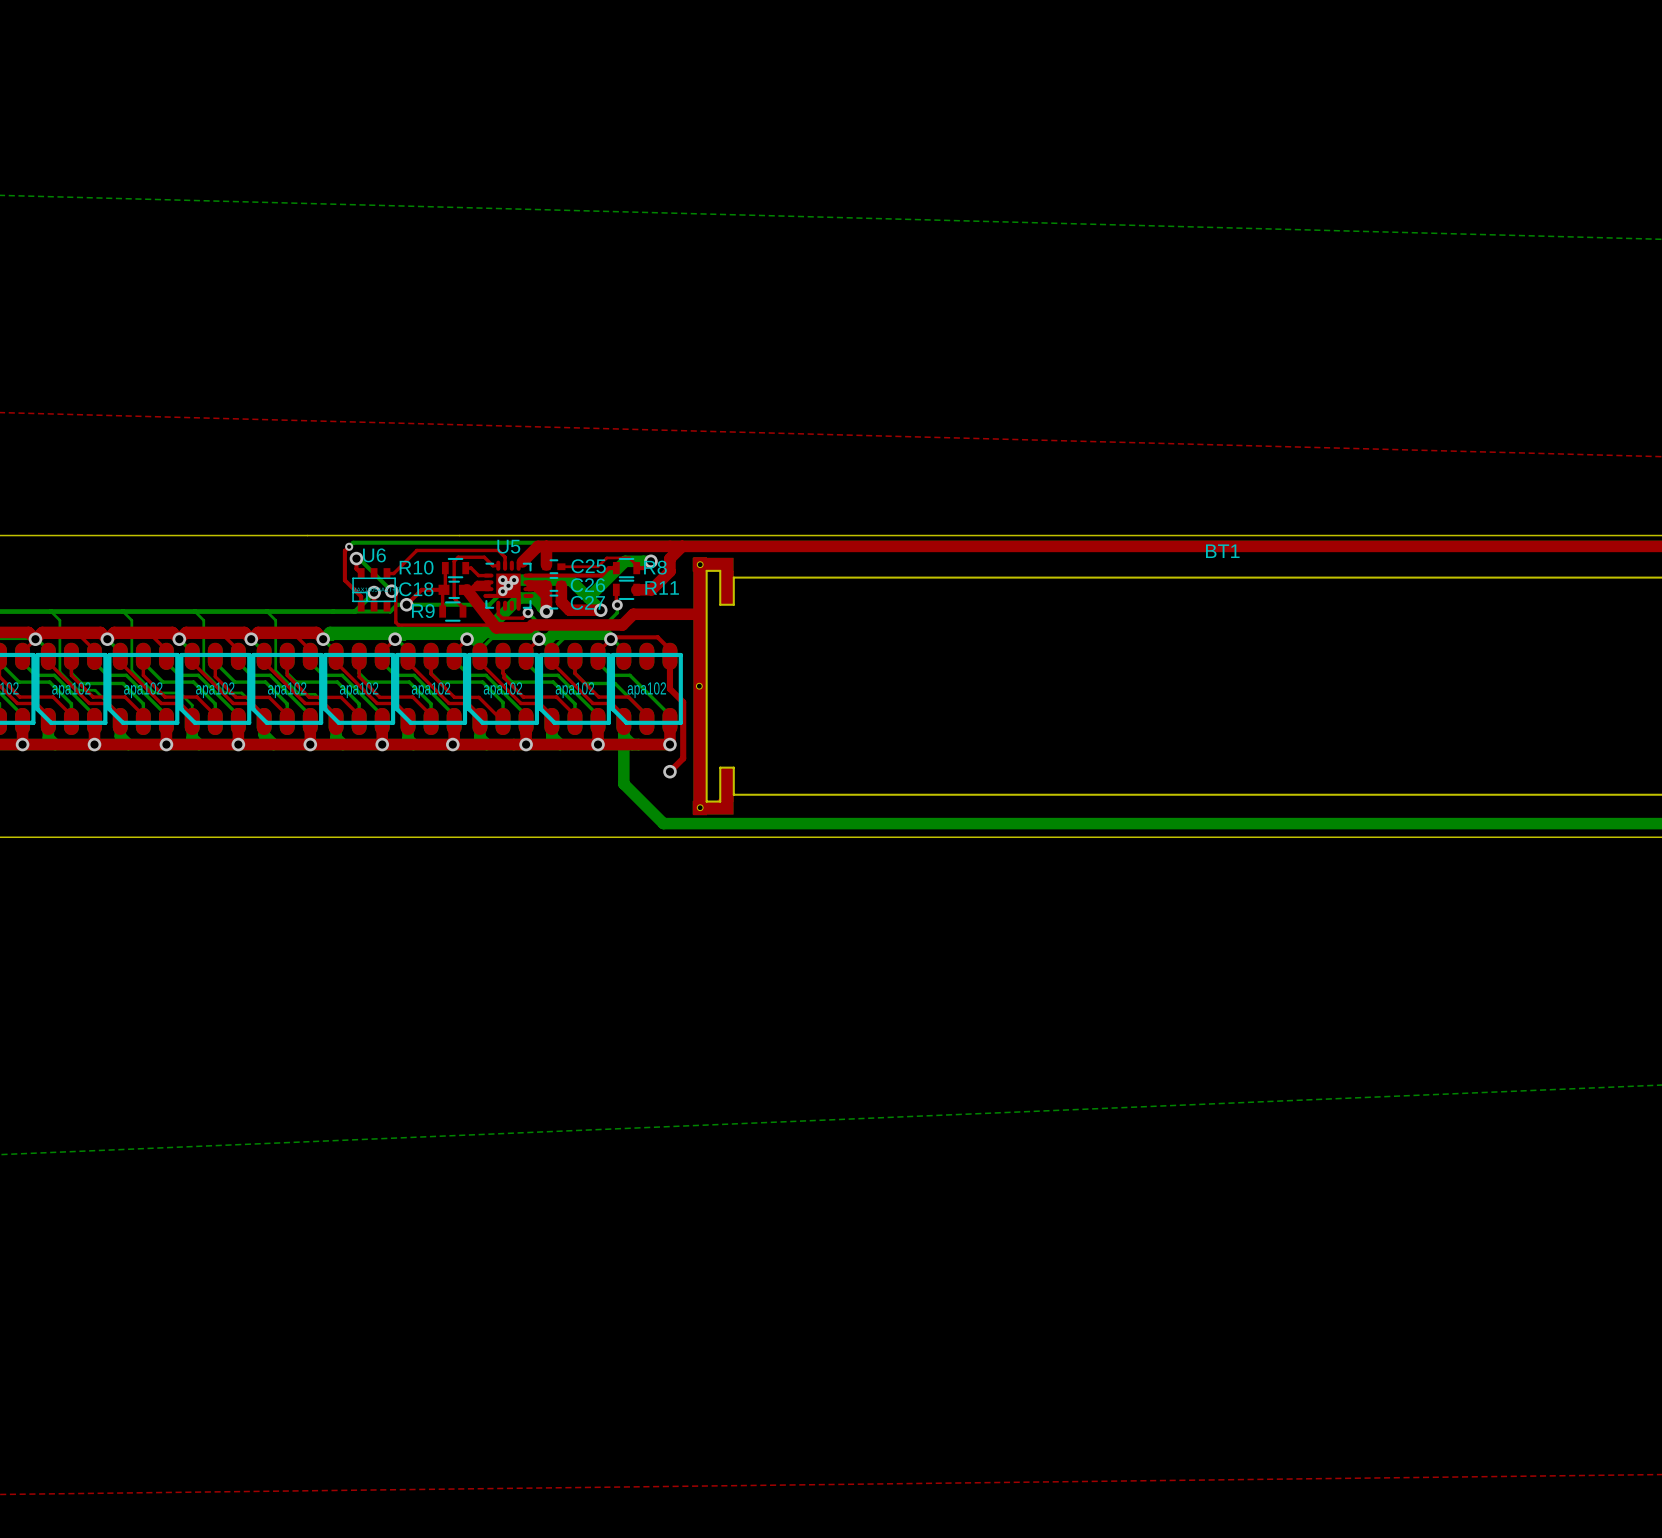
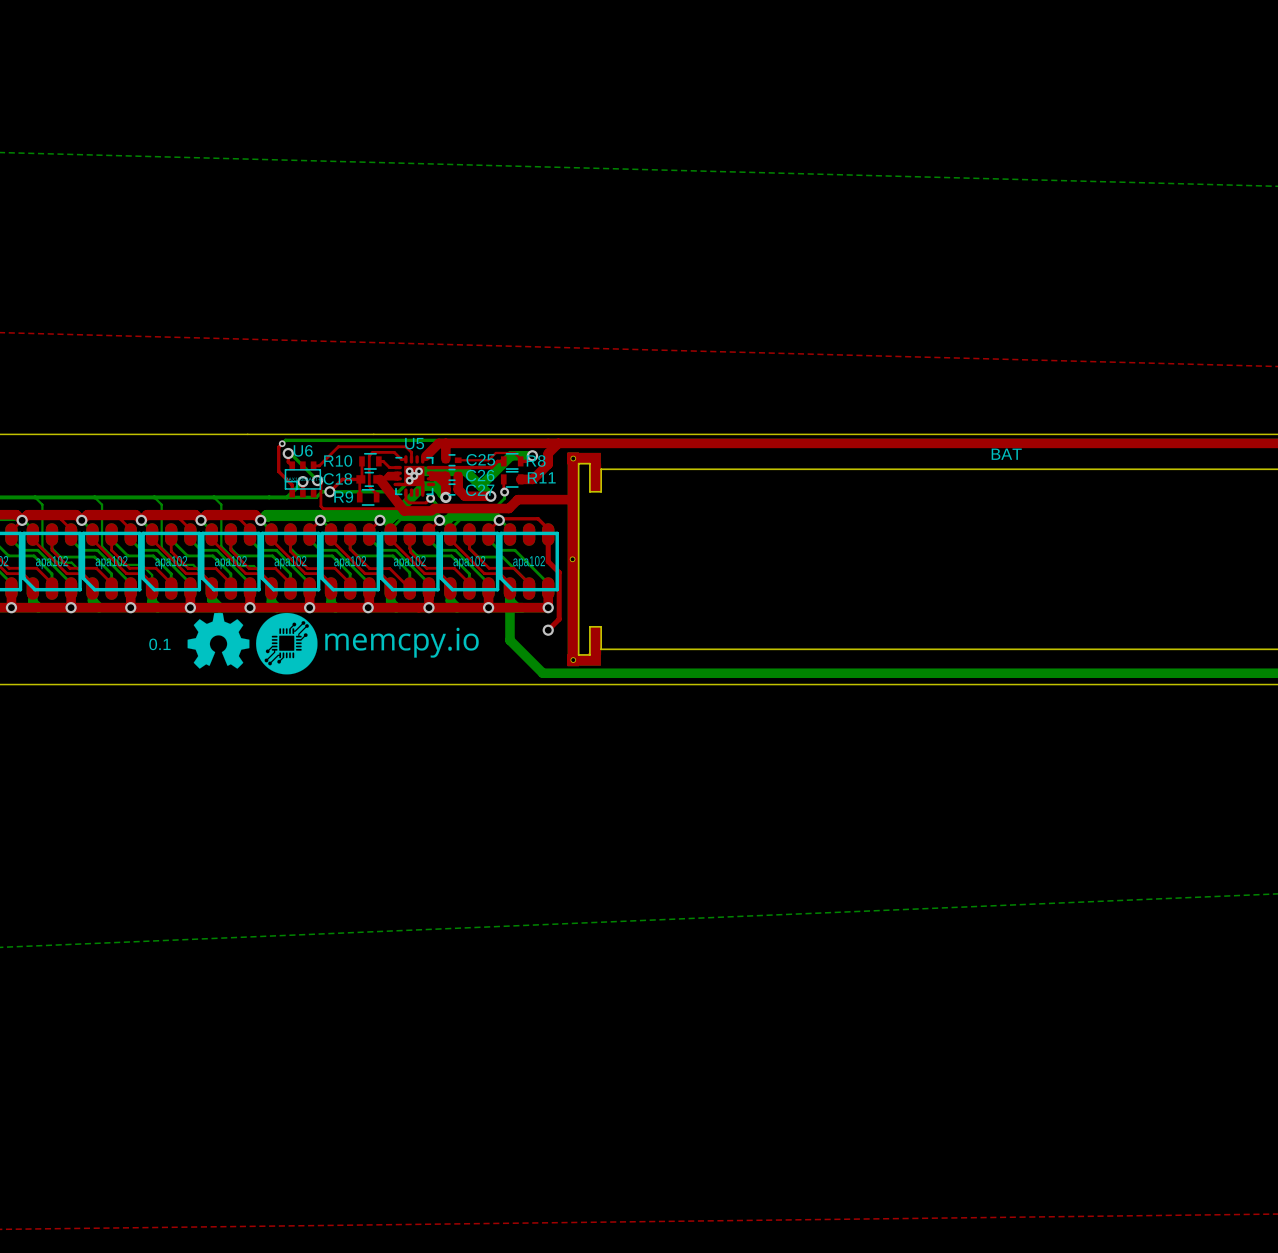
BT1 name: BT1 (1222, 551) -> BAT (1006, 454)
drawing: none -> [187, 612, 479, 675]
text: none -> 0.1 (159, 644)

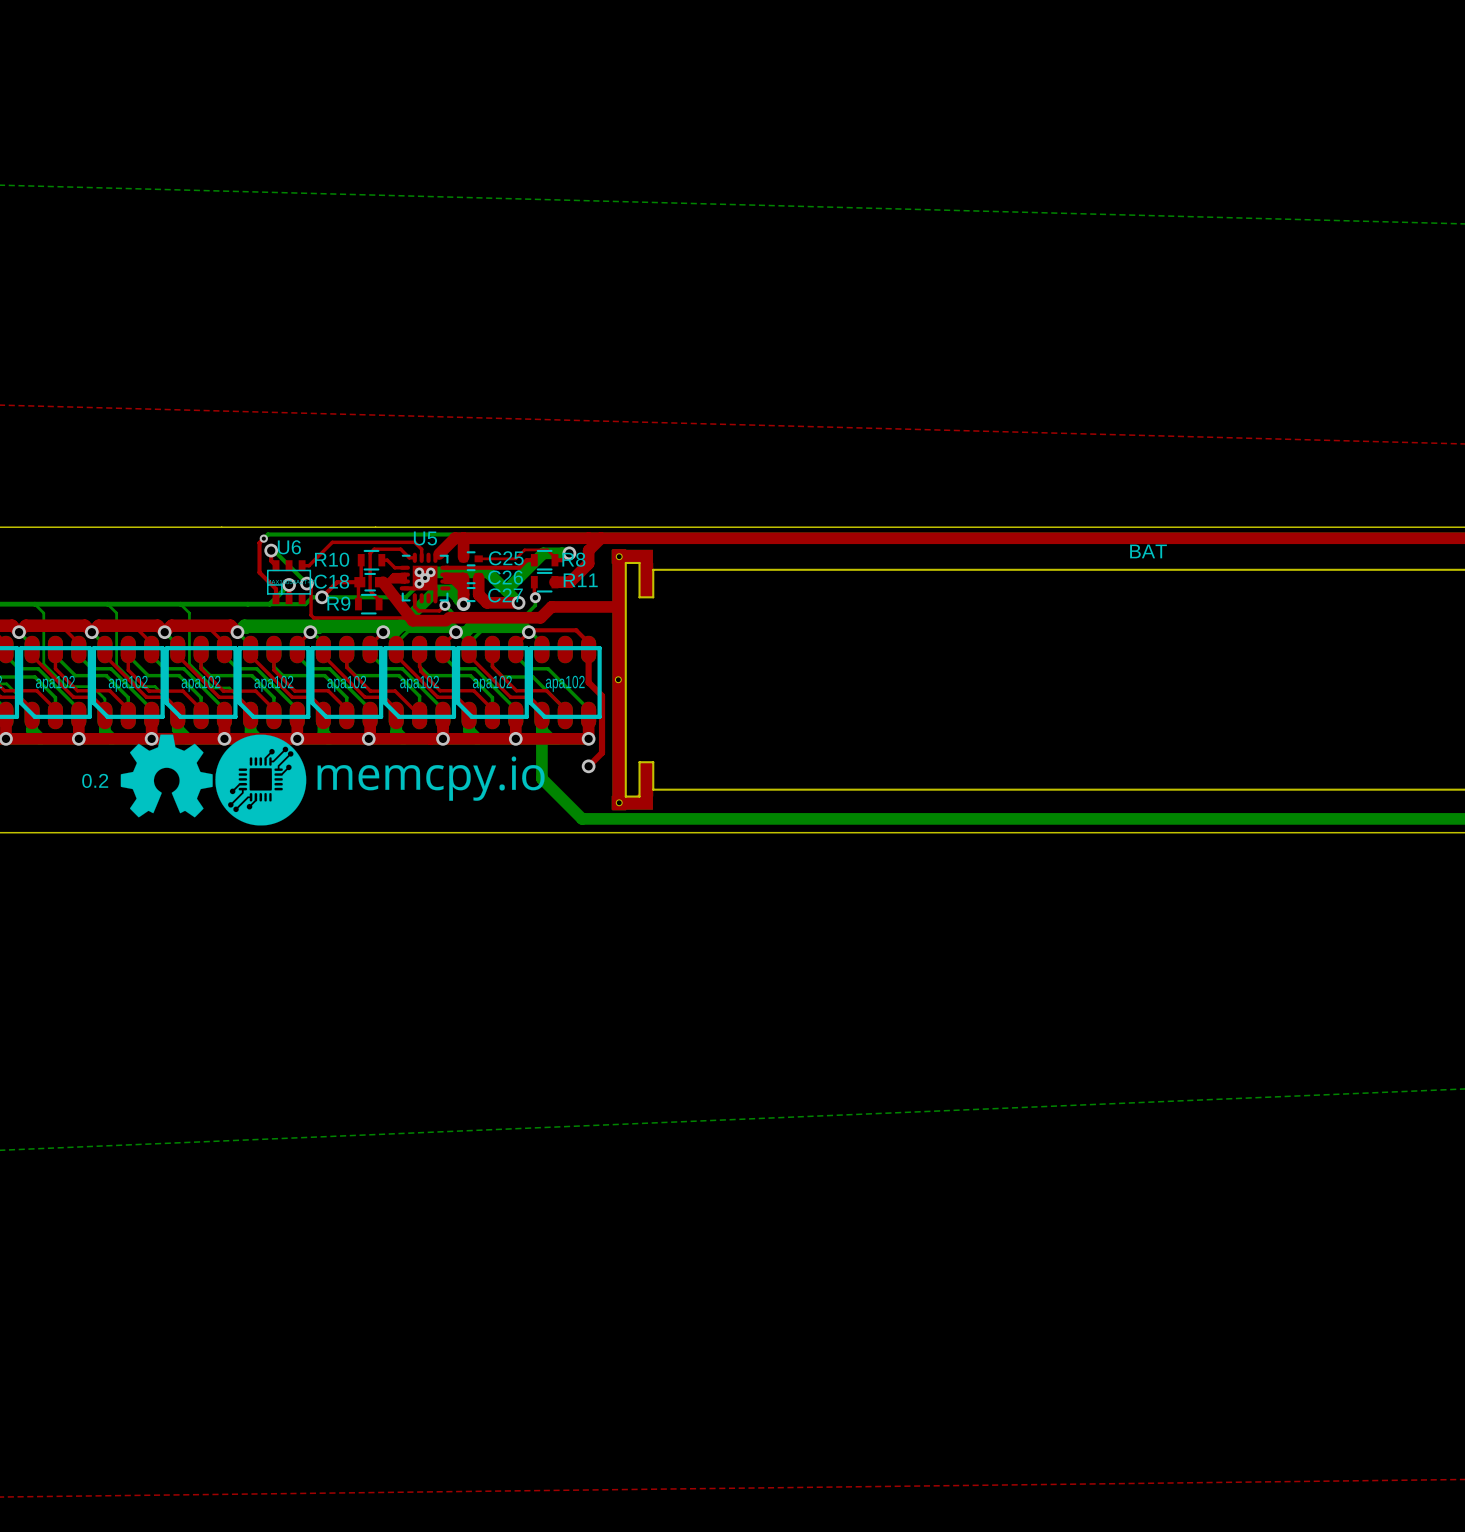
drawing: none -> [120, 734, 213, 818]
drawing shape: [256, 612, 479, 675] -> [215, 734, 545, 826]
drawing: [187, 613, 250, 669] -> none
text: 0.1 (159, 644) -> 0.2 (95, 780)

